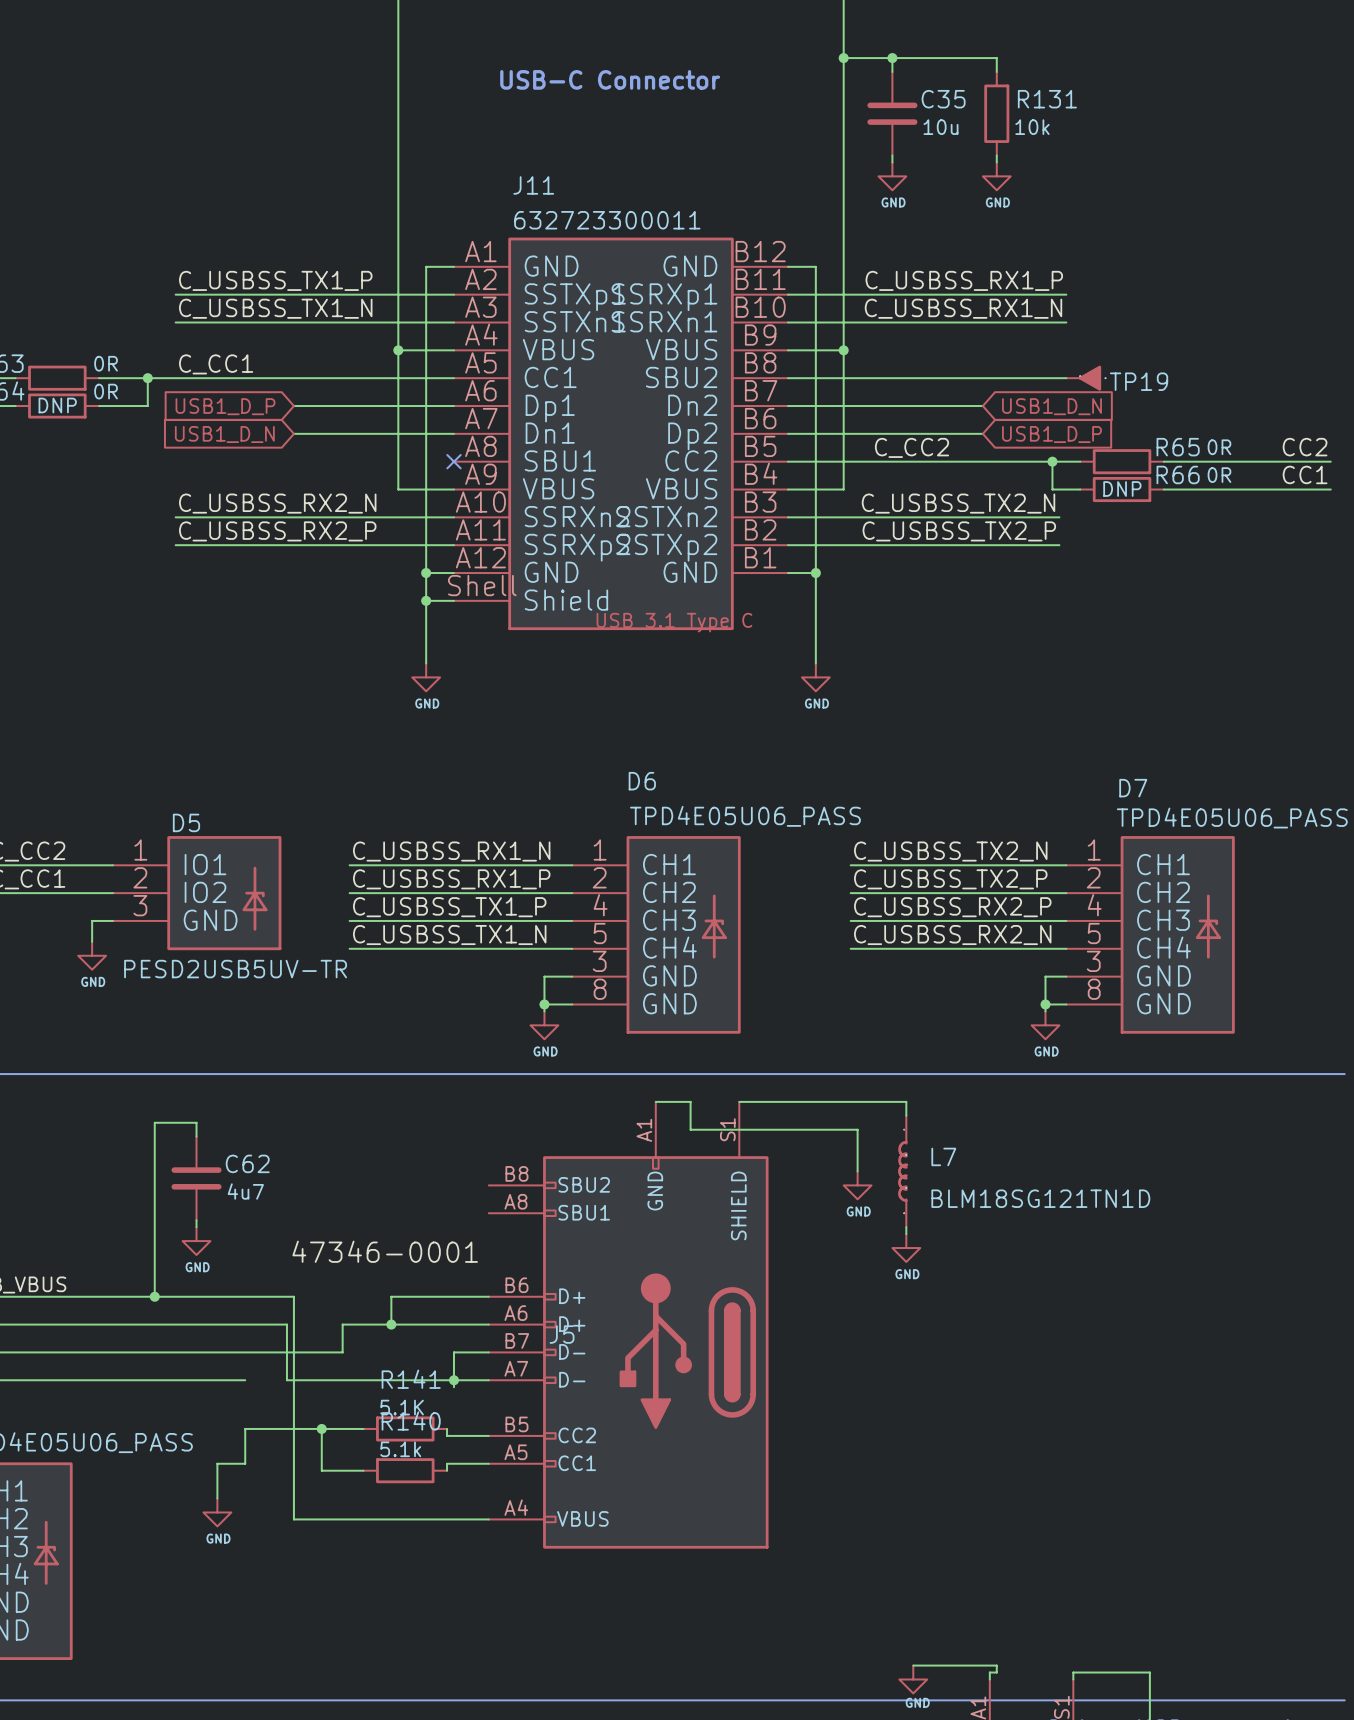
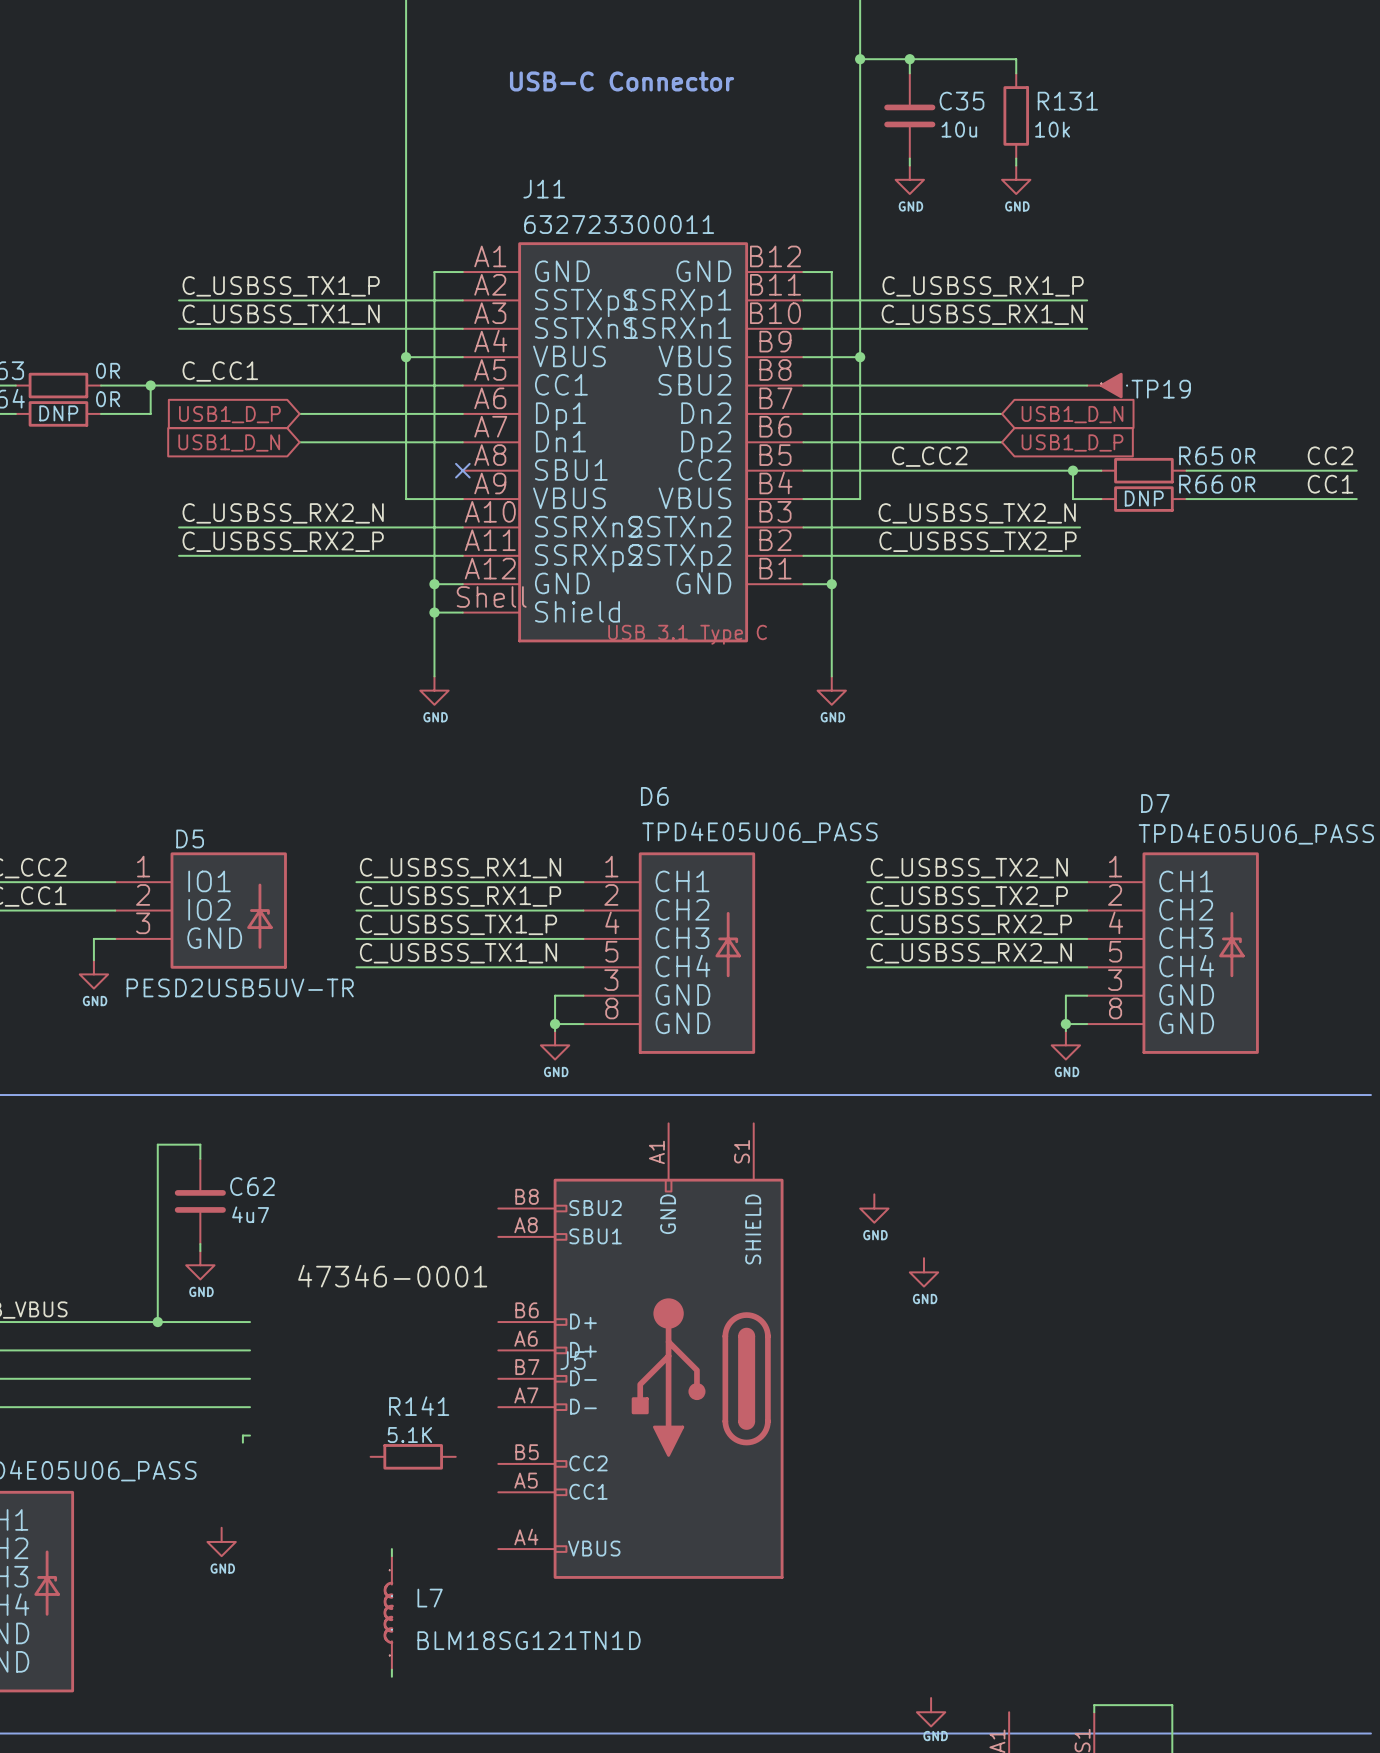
wire: (655, 1101) (690, 1101) (690, 1129) (857, 1129) (857, 1171) -> none
wire: (739, 1101) (906, 1101) (906, 1115) -> none
L7 position: (903, 1171) -> (388, 1612)
wire: (906, 1227) (906, 1234) -> none
wire: (245, 1296) (293, 1296) (293, 1519) (488, 1519) -> none
wire: (488, 1296) (391, 1296) (391, 1324) -> none
wire: (245, 1324) (286, 1324) (286, 1380) (488, 1380) -> none
junction: (391, 1324) -> none
wire: (488, 1324) (342, 1324) (342, 1352) (245, 1352) -> none
wire: (488, 1352) (453, 1352) (453, 1387) -> none
junction: (453, 1380) -> none
wire: none -> (250, 1435) (242, 1435) (242, 1442)
wire: (321, 1428) (321, 1470) (363, 1470) -> none
junction: (321, 1428) -> none
wire: (363, 1428) (245, 1428) (245, 1463) (217, 1463) (217, 1498) -> none
wire: (447, 1428) (447, 1435) (488, 1435) -> none
wire: (488, 1463) (447, 1463) (447, 1470) -> none
R140: (405, 1470) -> none
wire: none -> (391, 1549) (391, 1556)
wire: none -> (391, 1669) (391, 1676)
wire: (913, 1665) (996, 1665) (996, 1672) (989, 1672) (989, 1679) -> none

